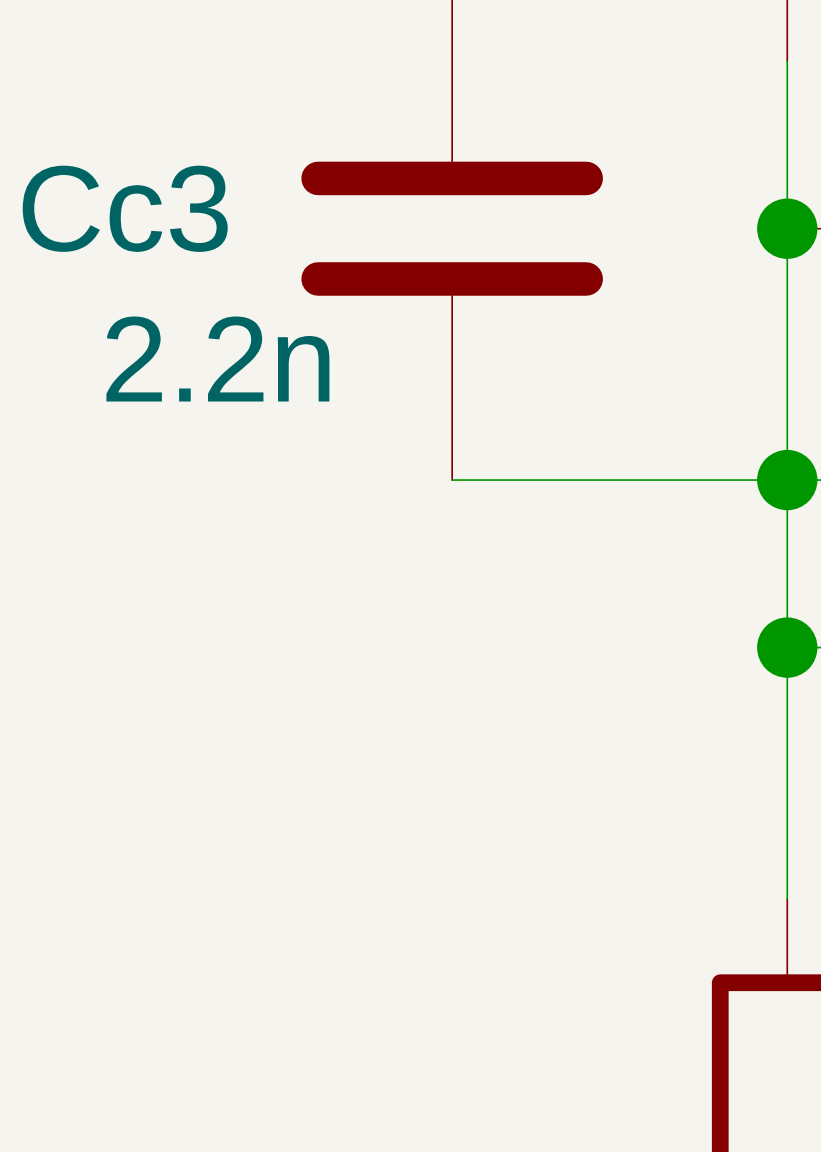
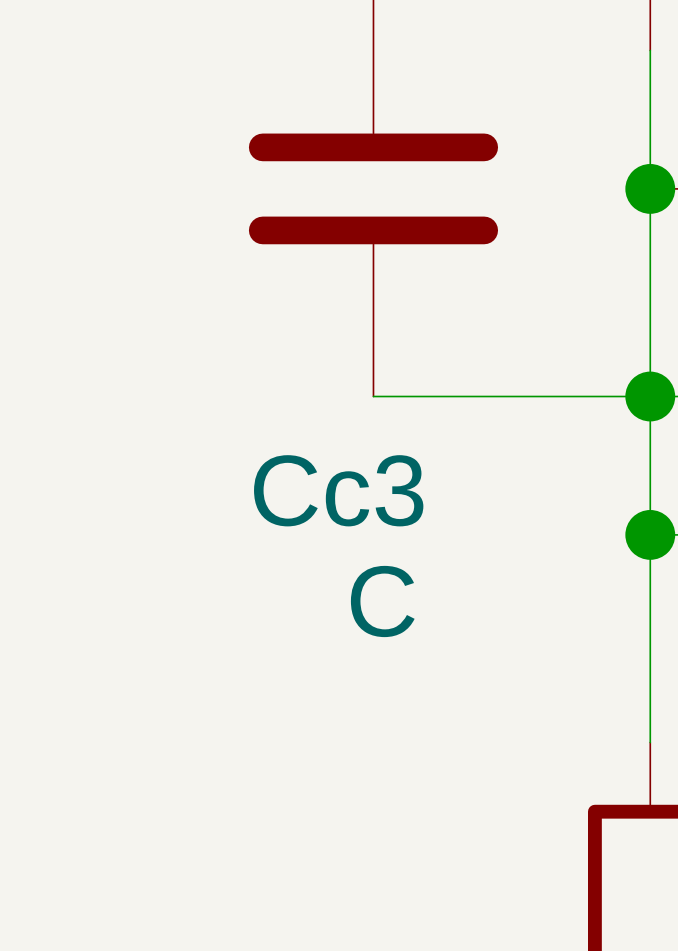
Cc3 name position: Cc3 (125, 208) -> Cc3 (338, 490)
Cc3 value: 2.2n (217, 358) -> C (382, 601)

